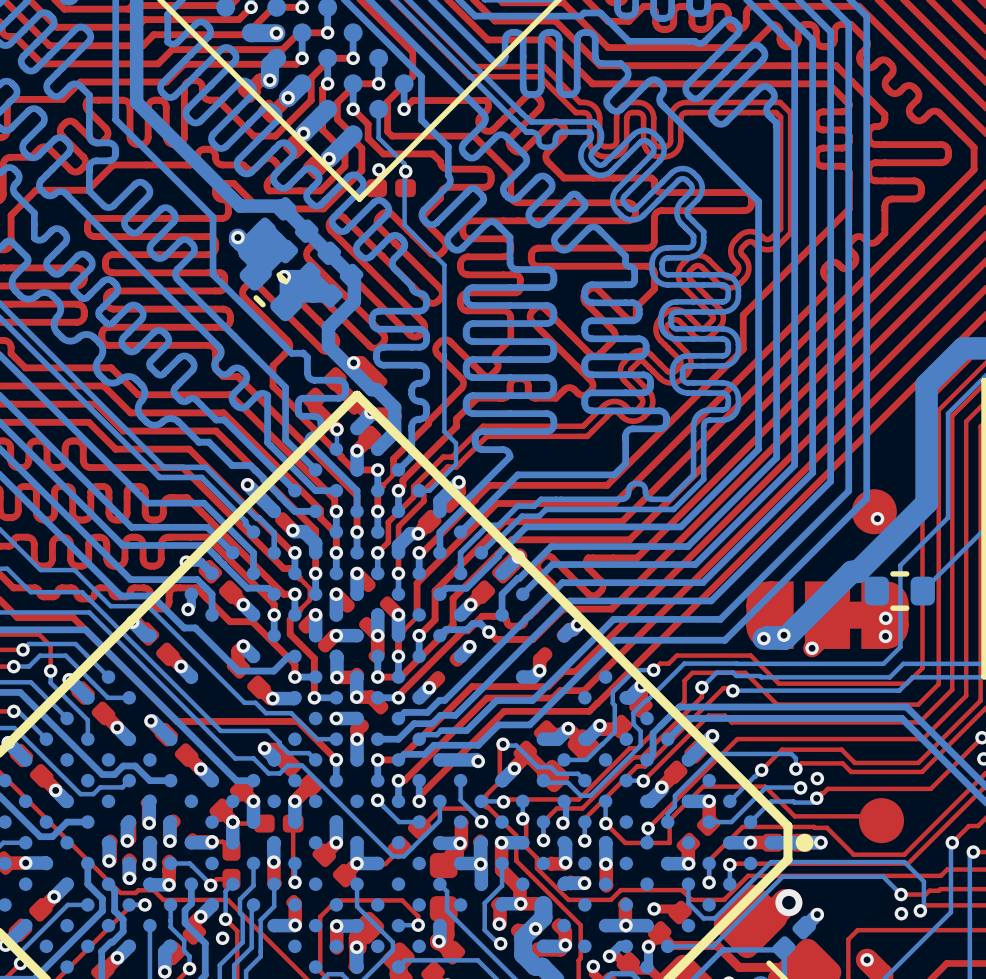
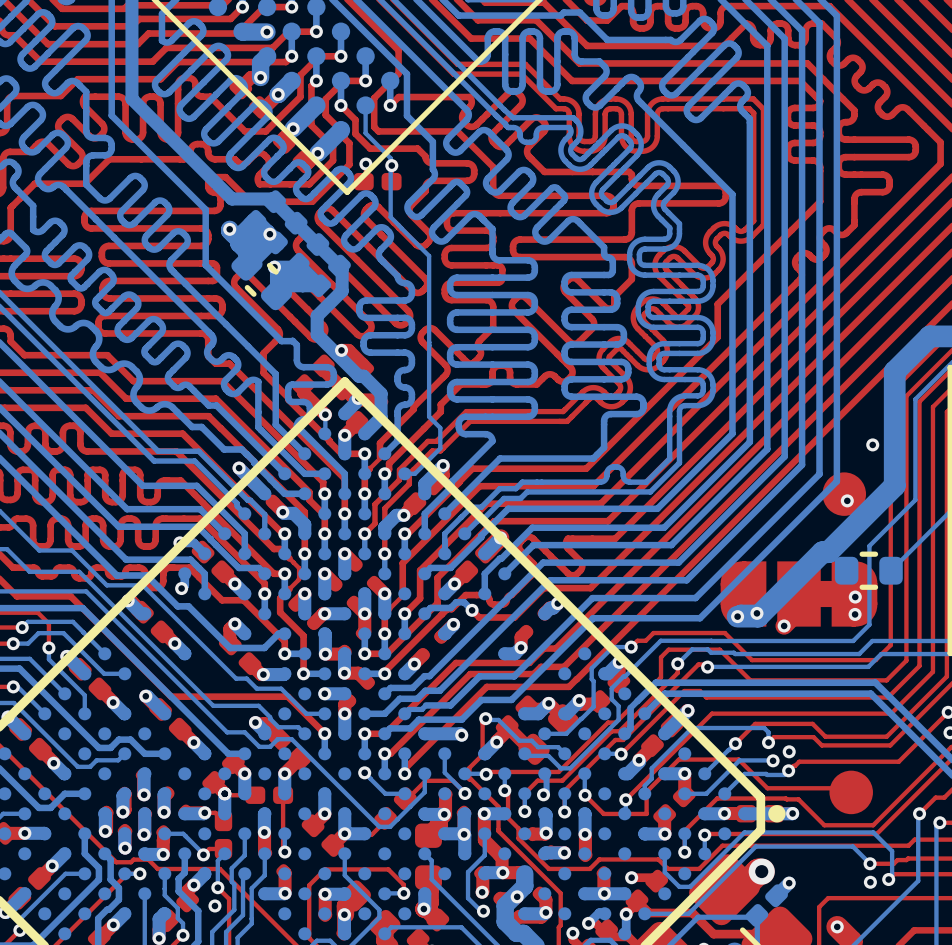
via: none -> (269, 234)
via: none -> (872, 444)

